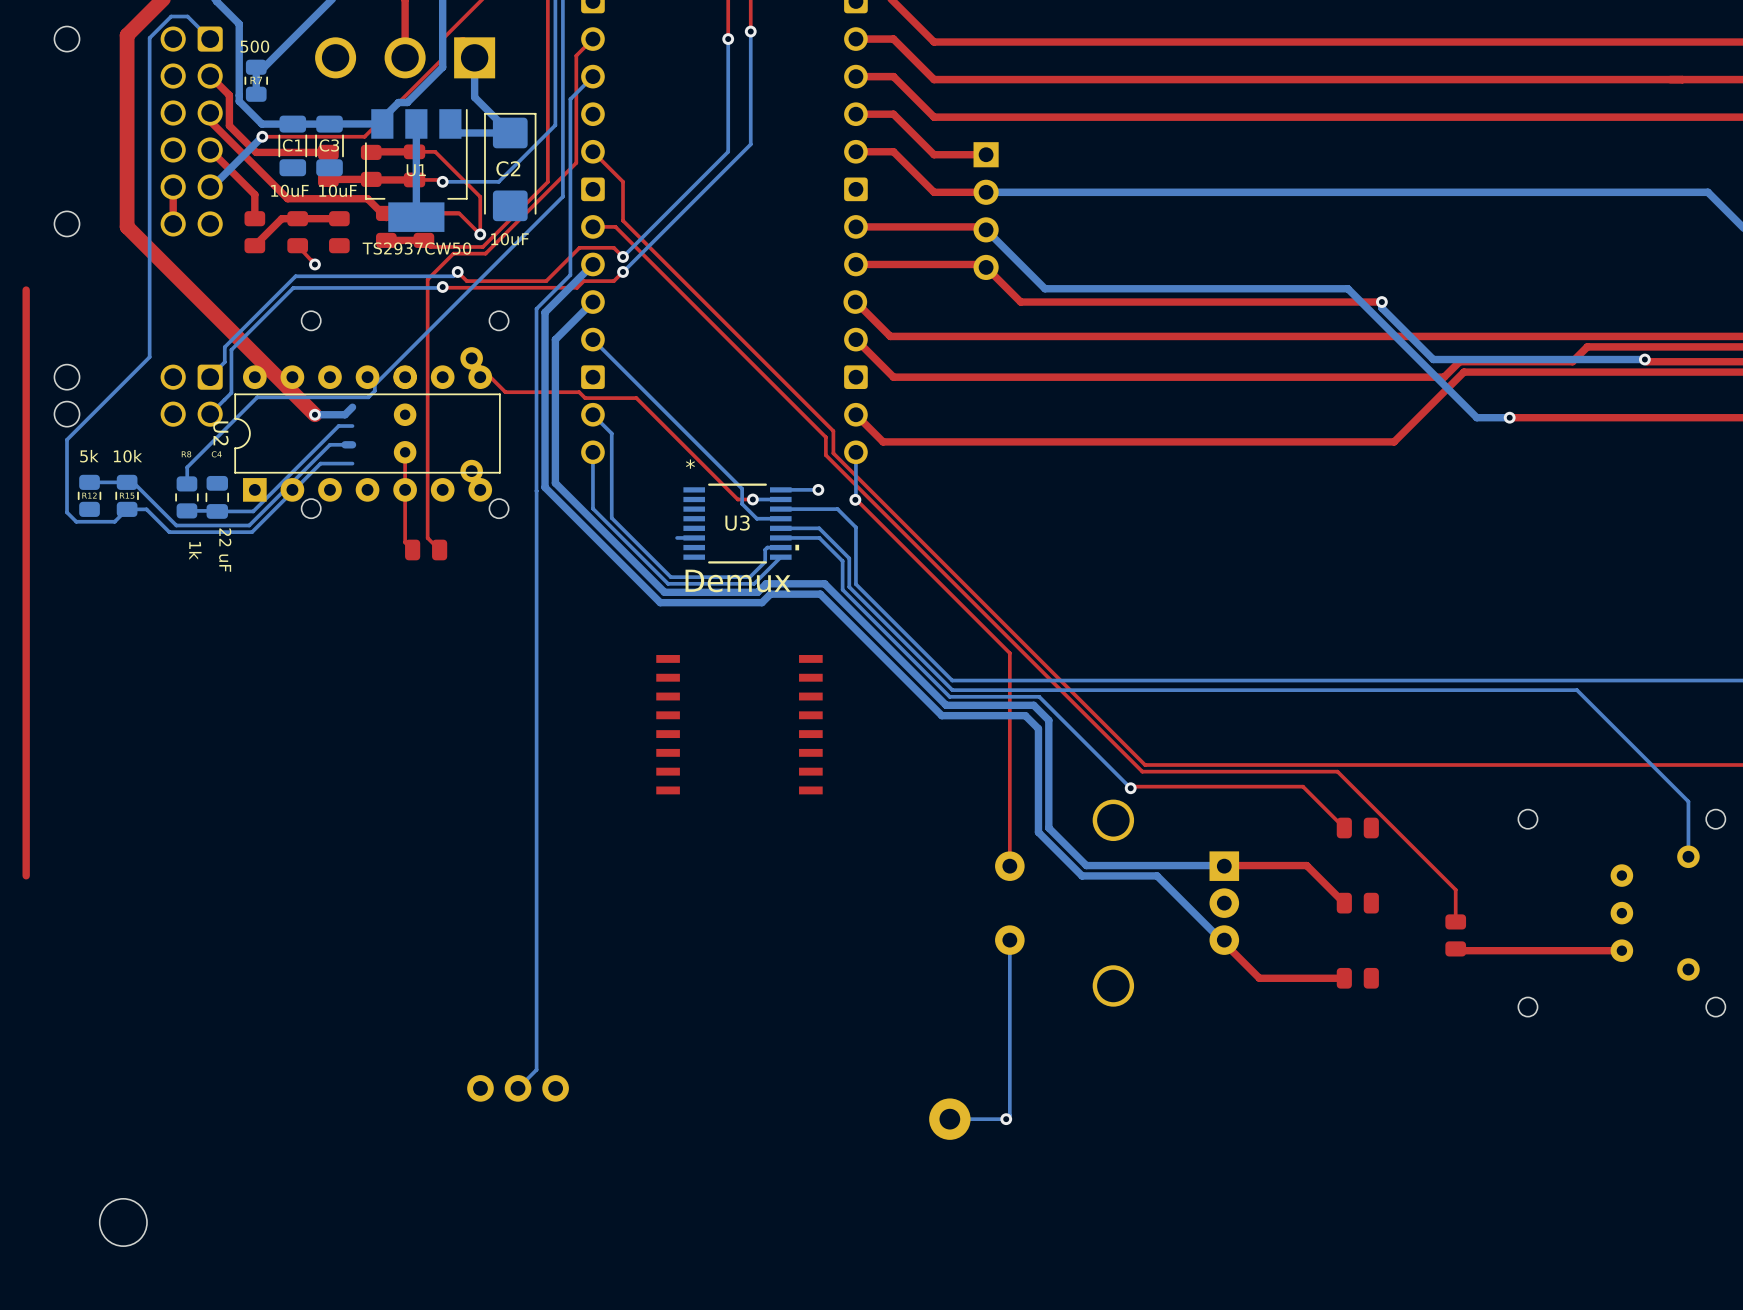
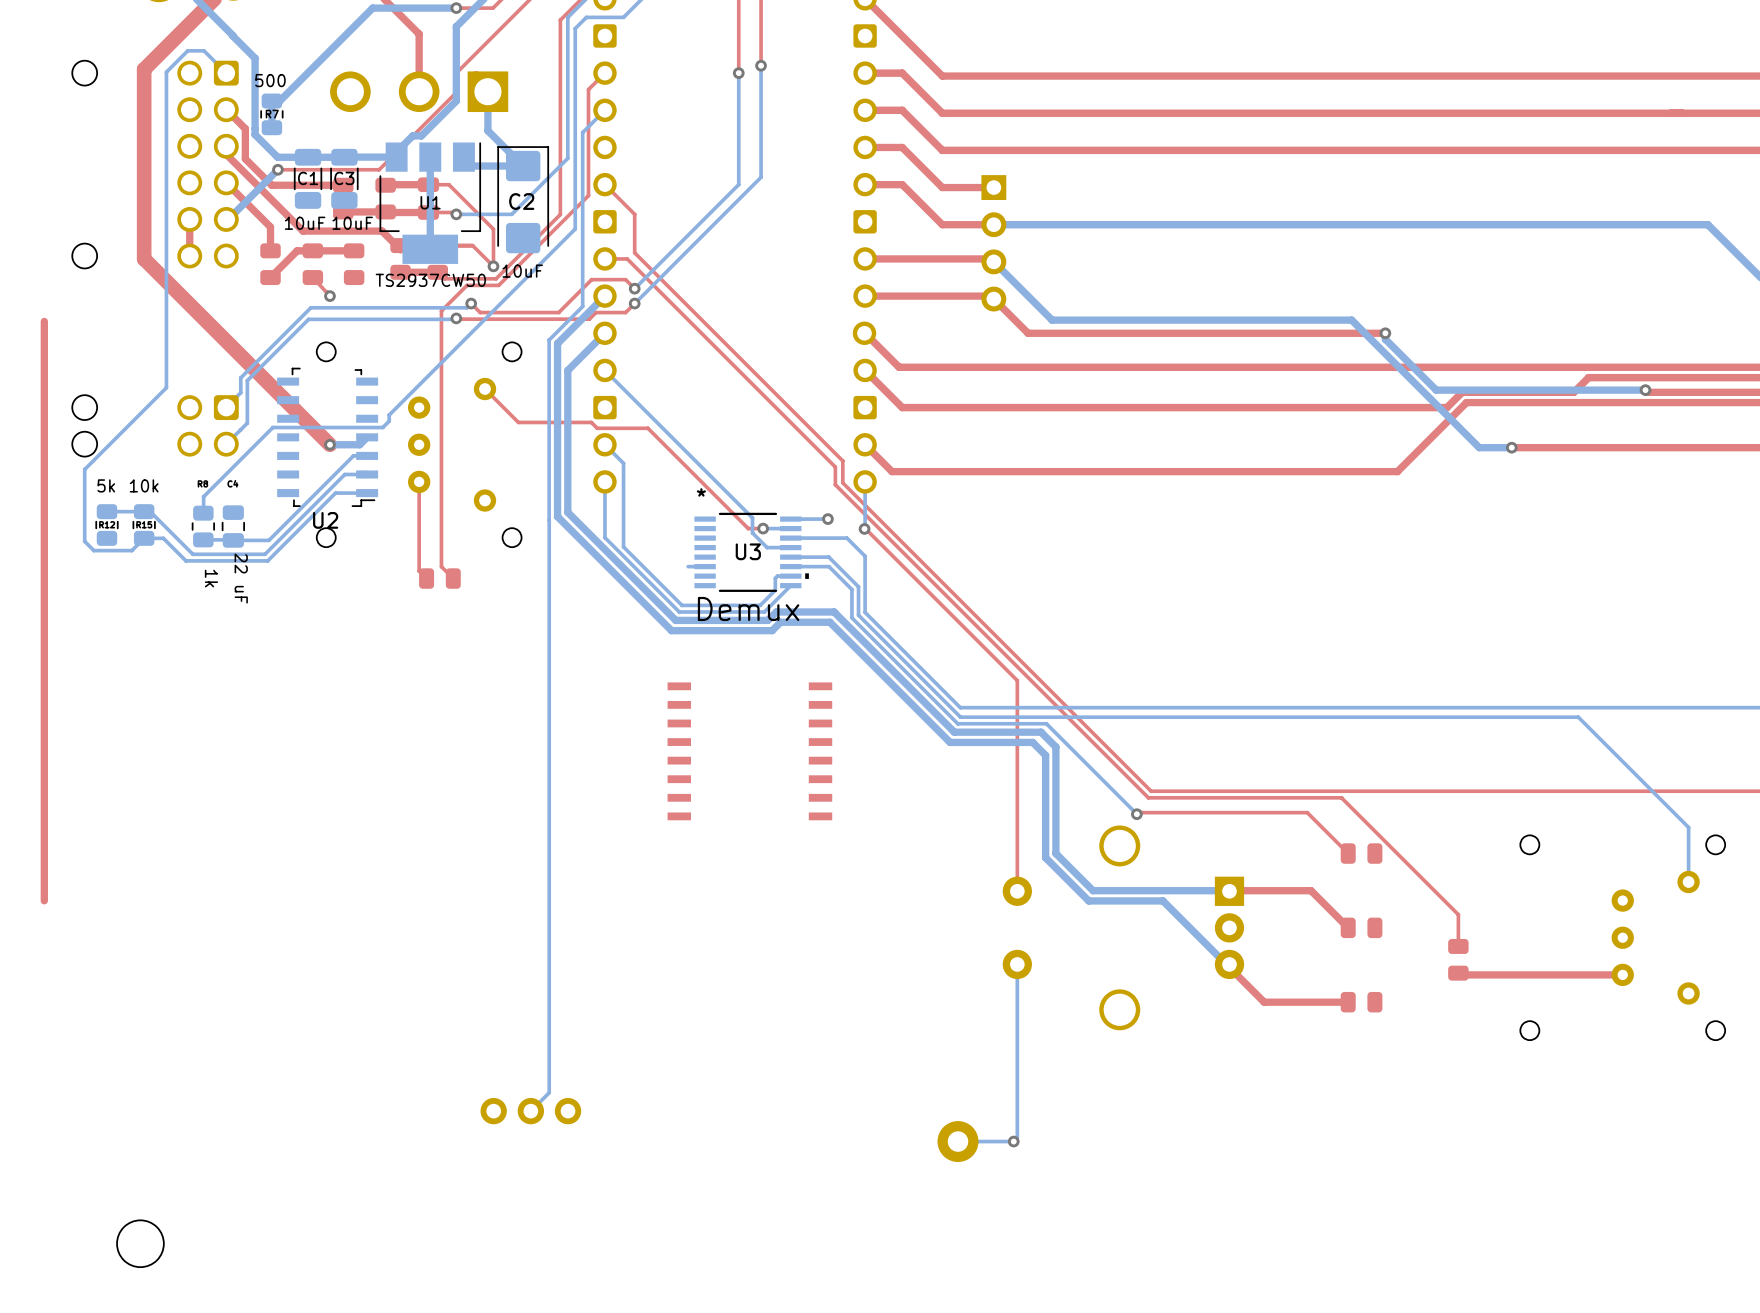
U2 footprint: [234, 365, 501, 502] -> [277, 367, 379, 507]
U2 name position: U2 (220, 433) -> U2 (325, 520)

